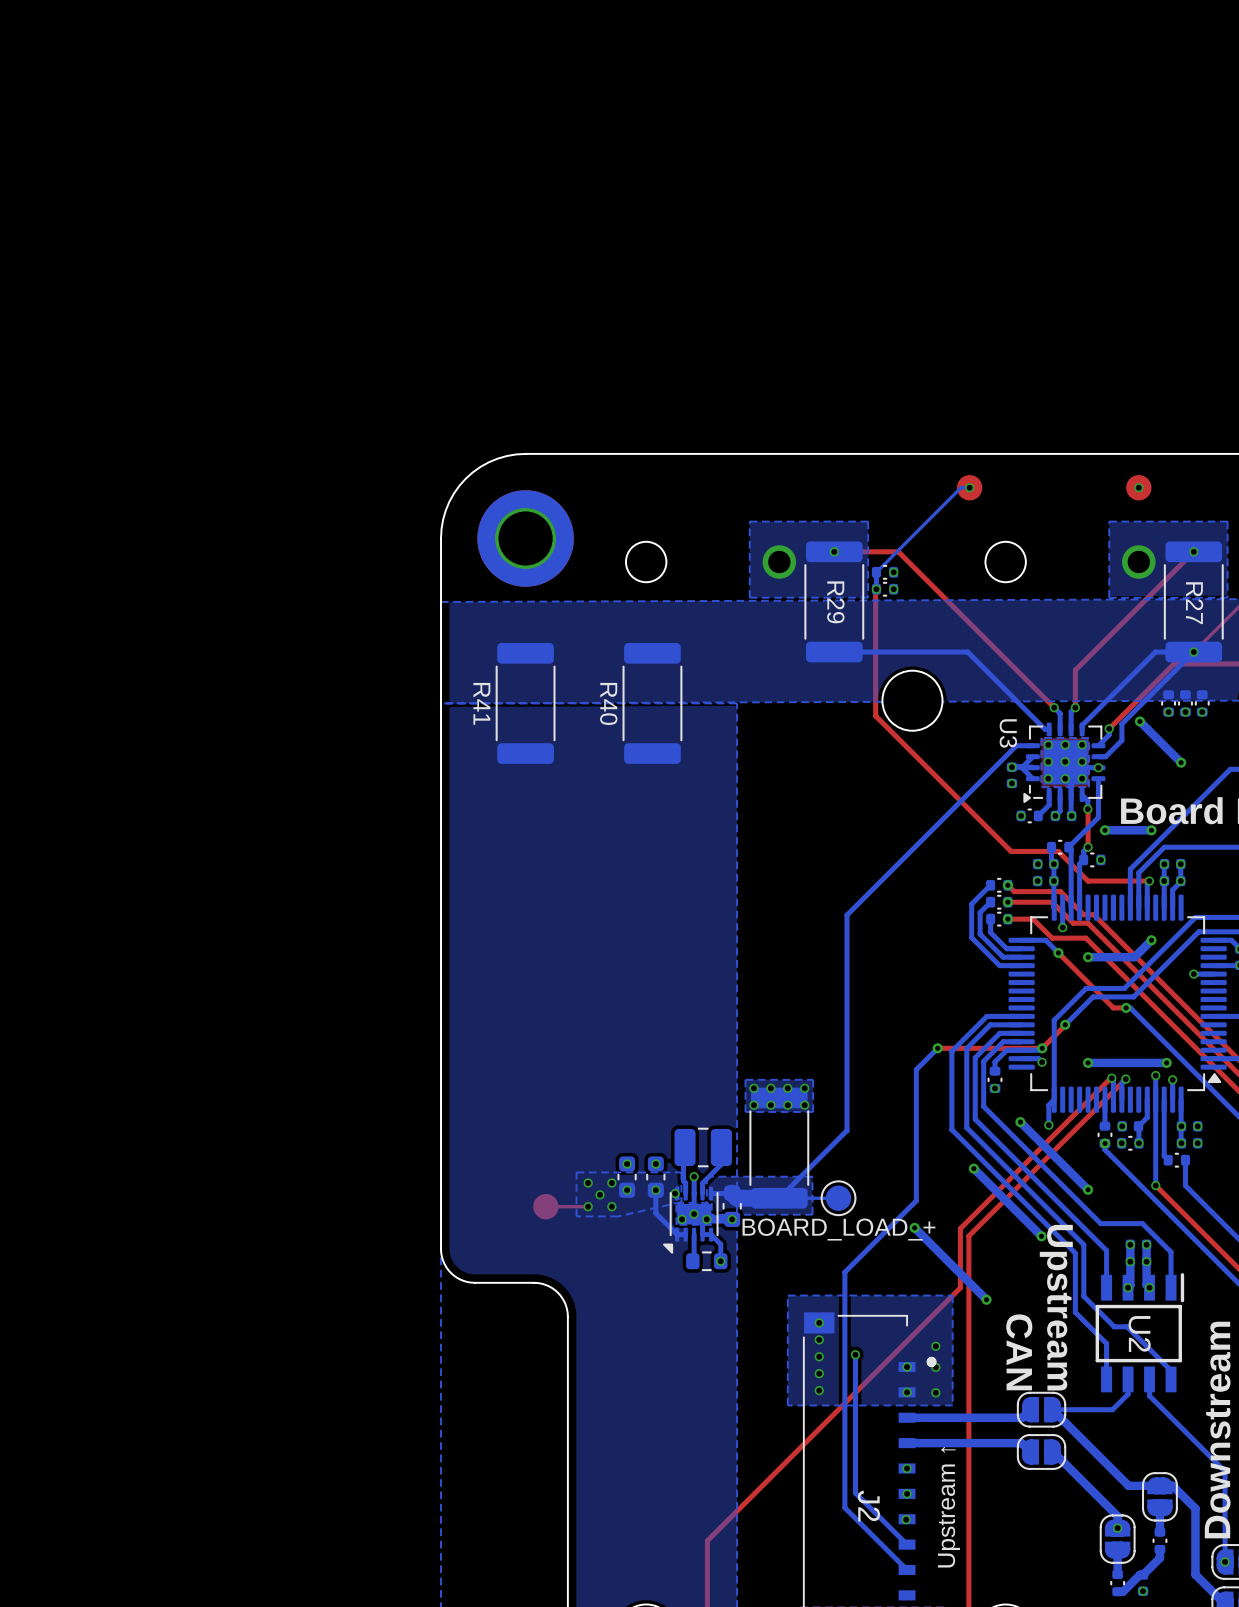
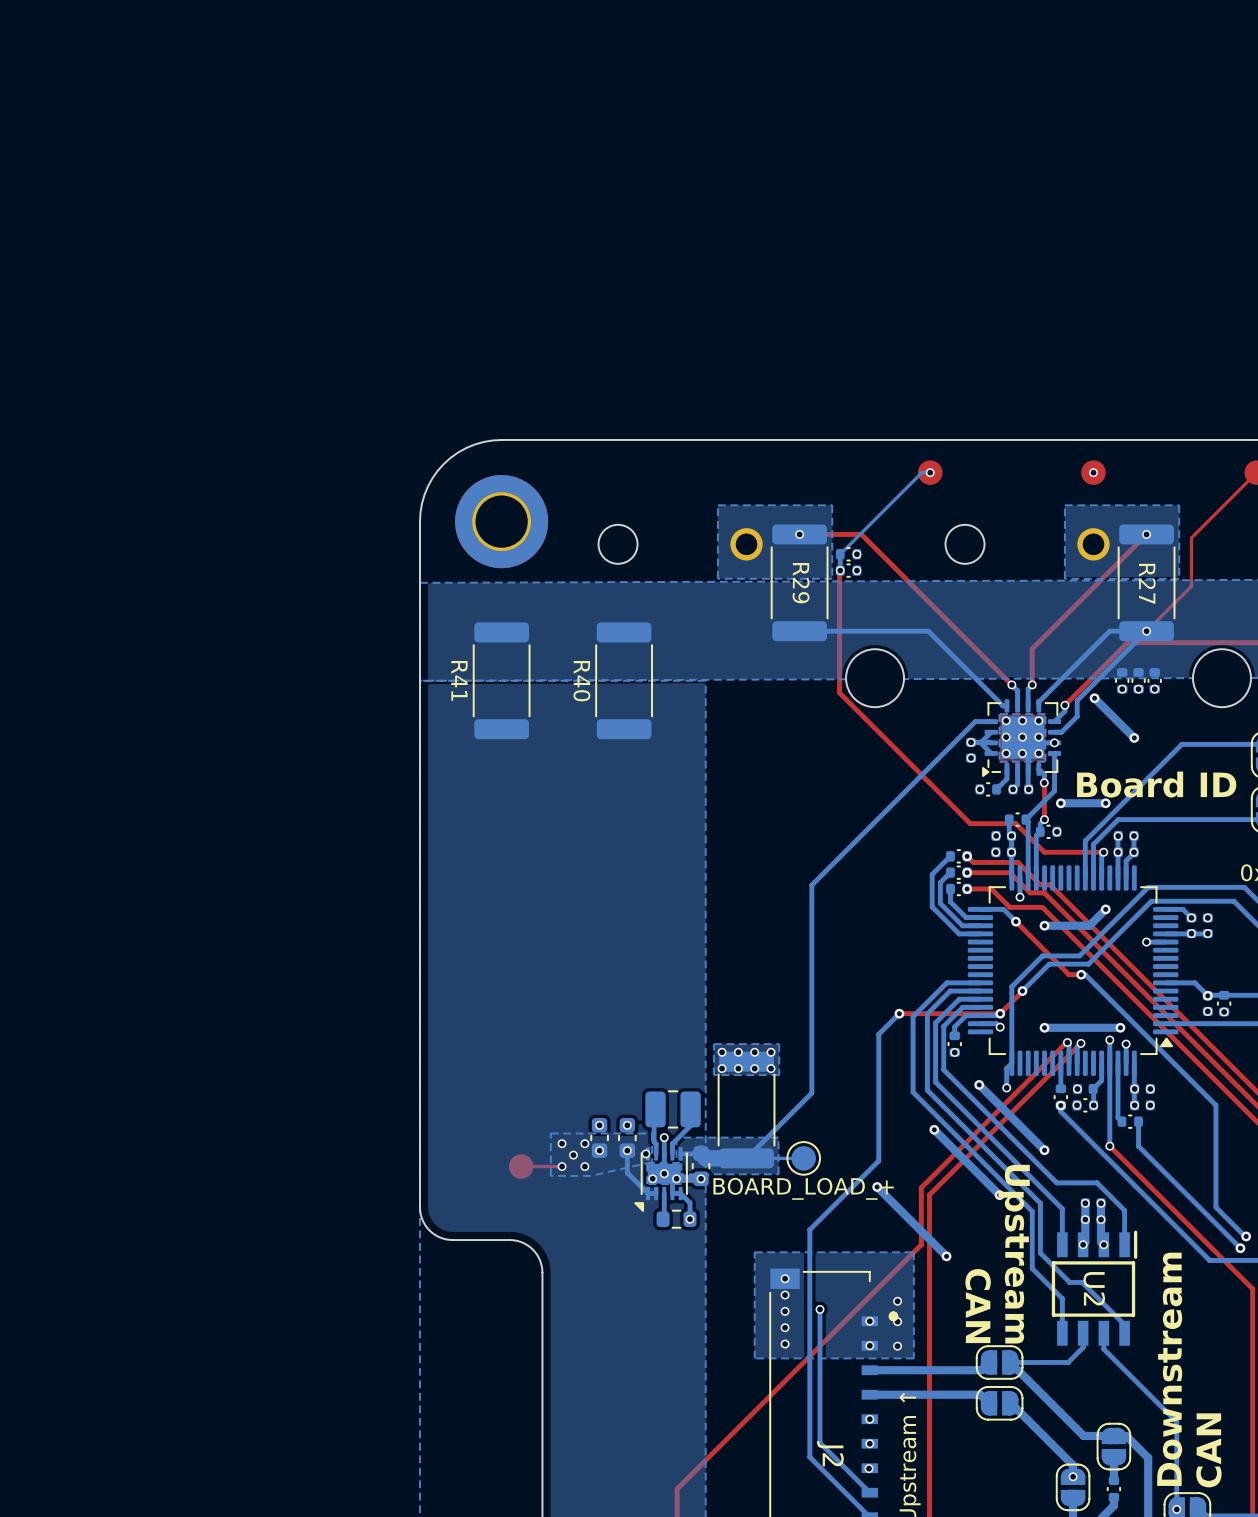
U3 name: U3 (1008, 733) -> none

